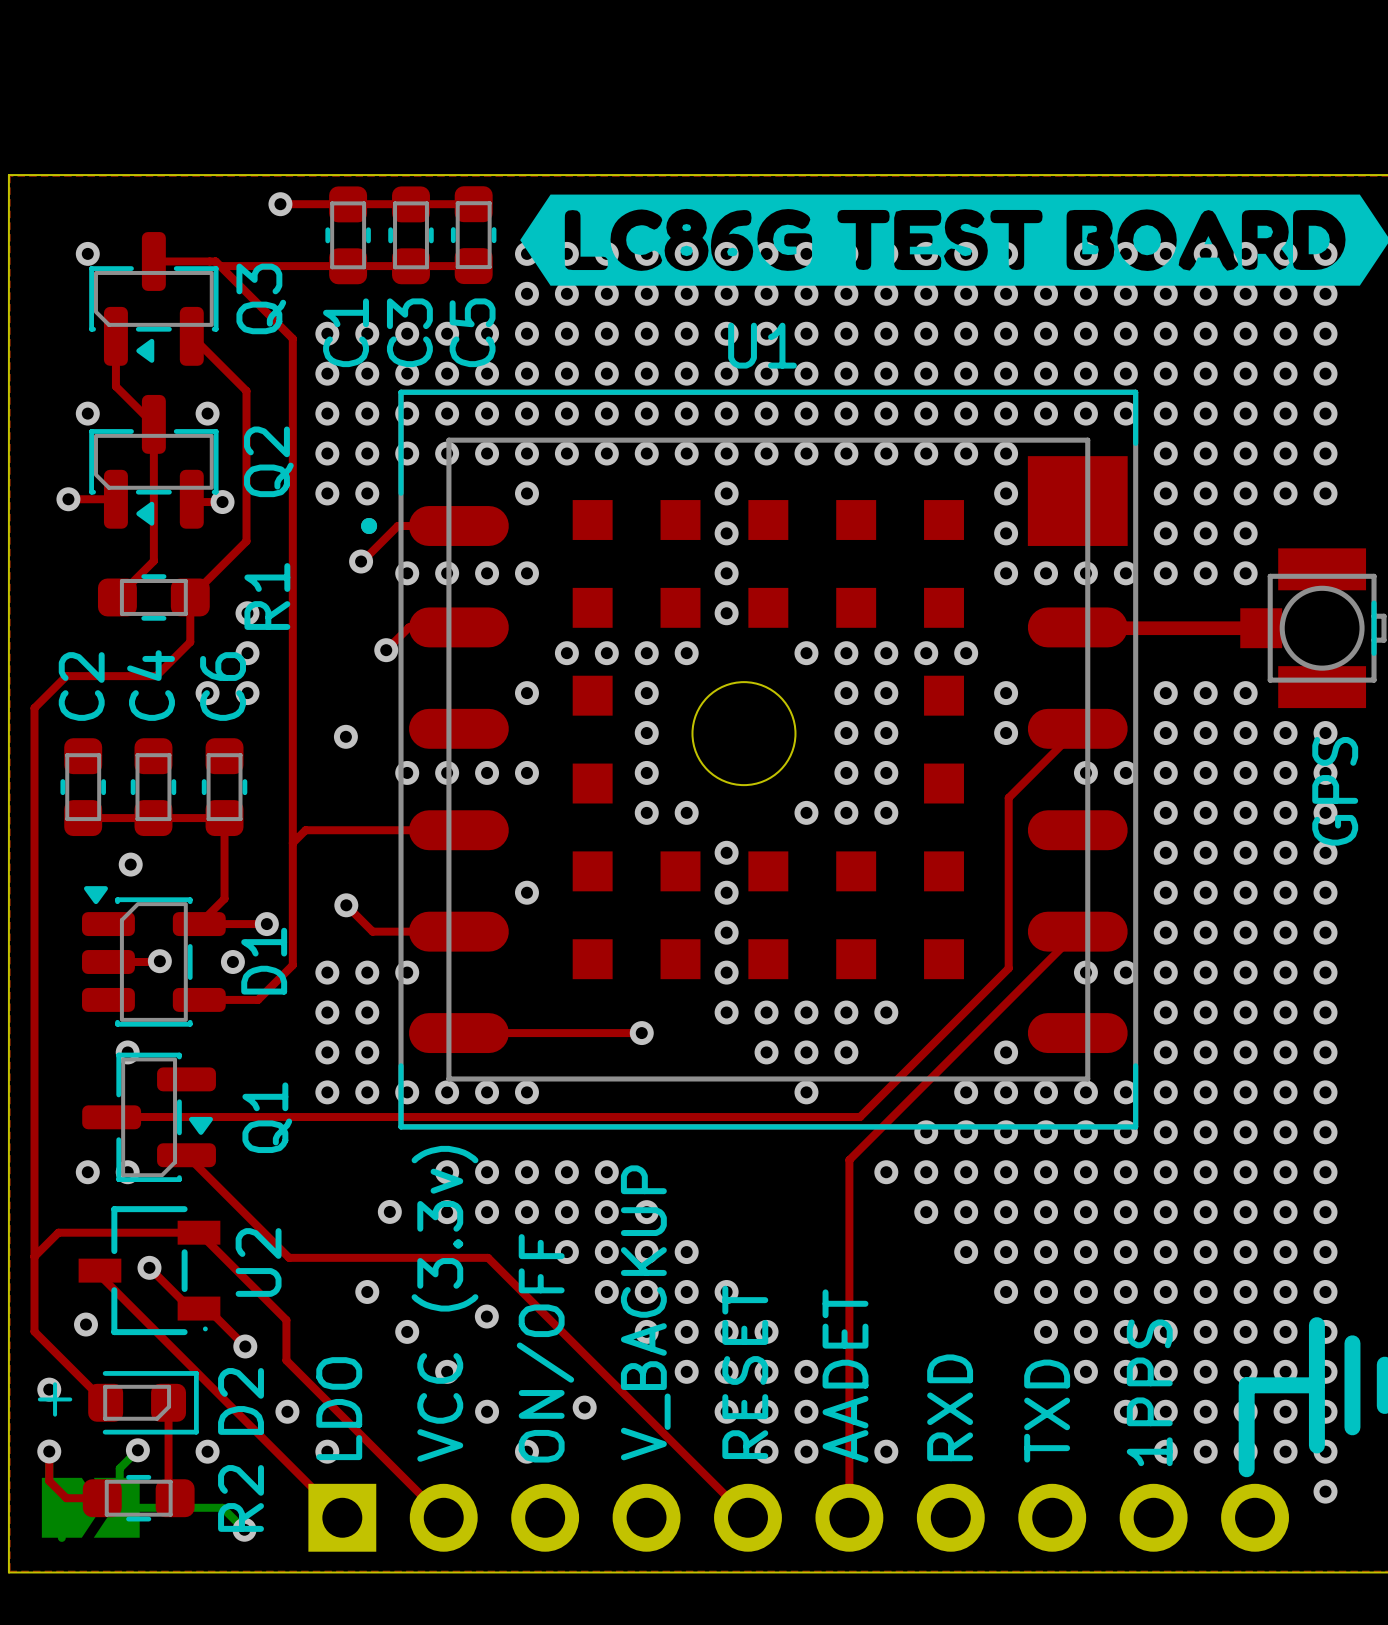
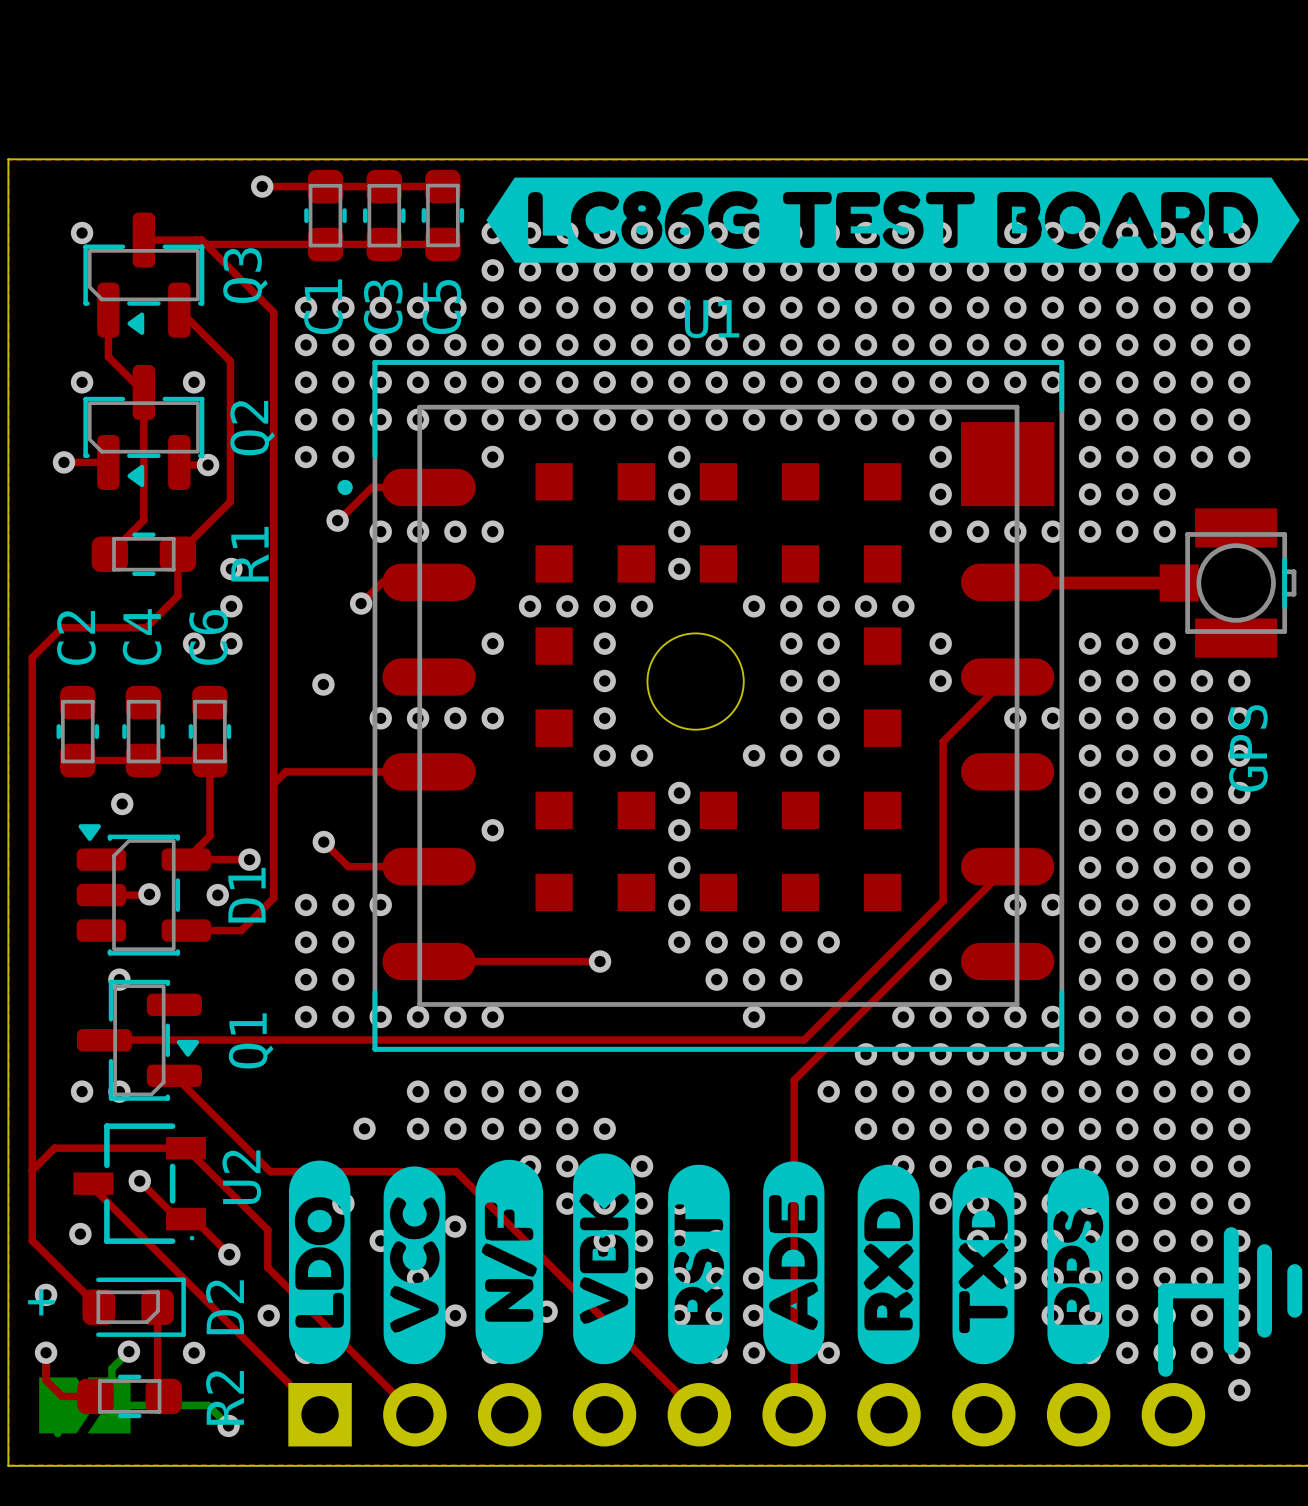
drawing: none -> [288, 1153, 1110, 1365]
text: VCC (3.3v) (445, 1303) -> none
text: V_BACKUP (645, 1312) -> none
text: ON/OFF (545, 1348) -> none
text: RESET (745, 1372) -> none
text: AADET (845, 1376) -> none
text: 1PPS (1149, 1392) -> none
text: RXD (950, 1407) -> none
text: LDO (339, 1408) -> none
text: TXD (1047, 1411) -> none

